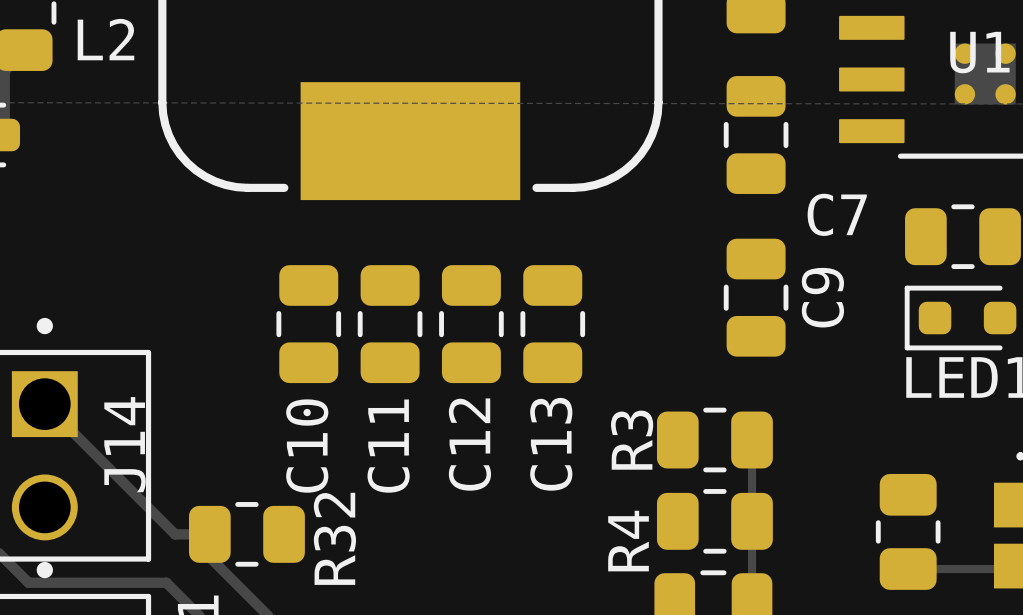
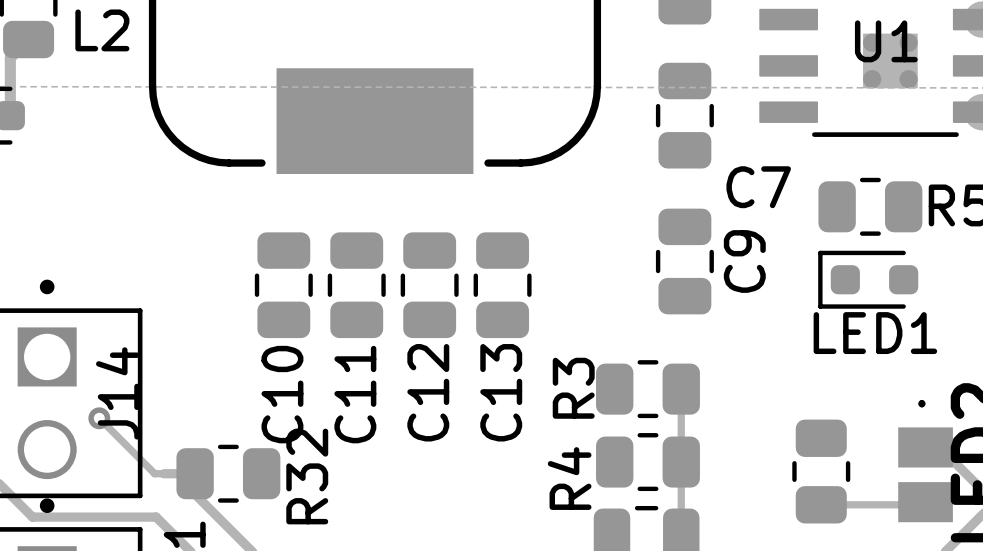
track: (44, 404) (175, 534) -> (99, 418) (154, 473) (163, 473)
via: none -> (99, 418)

